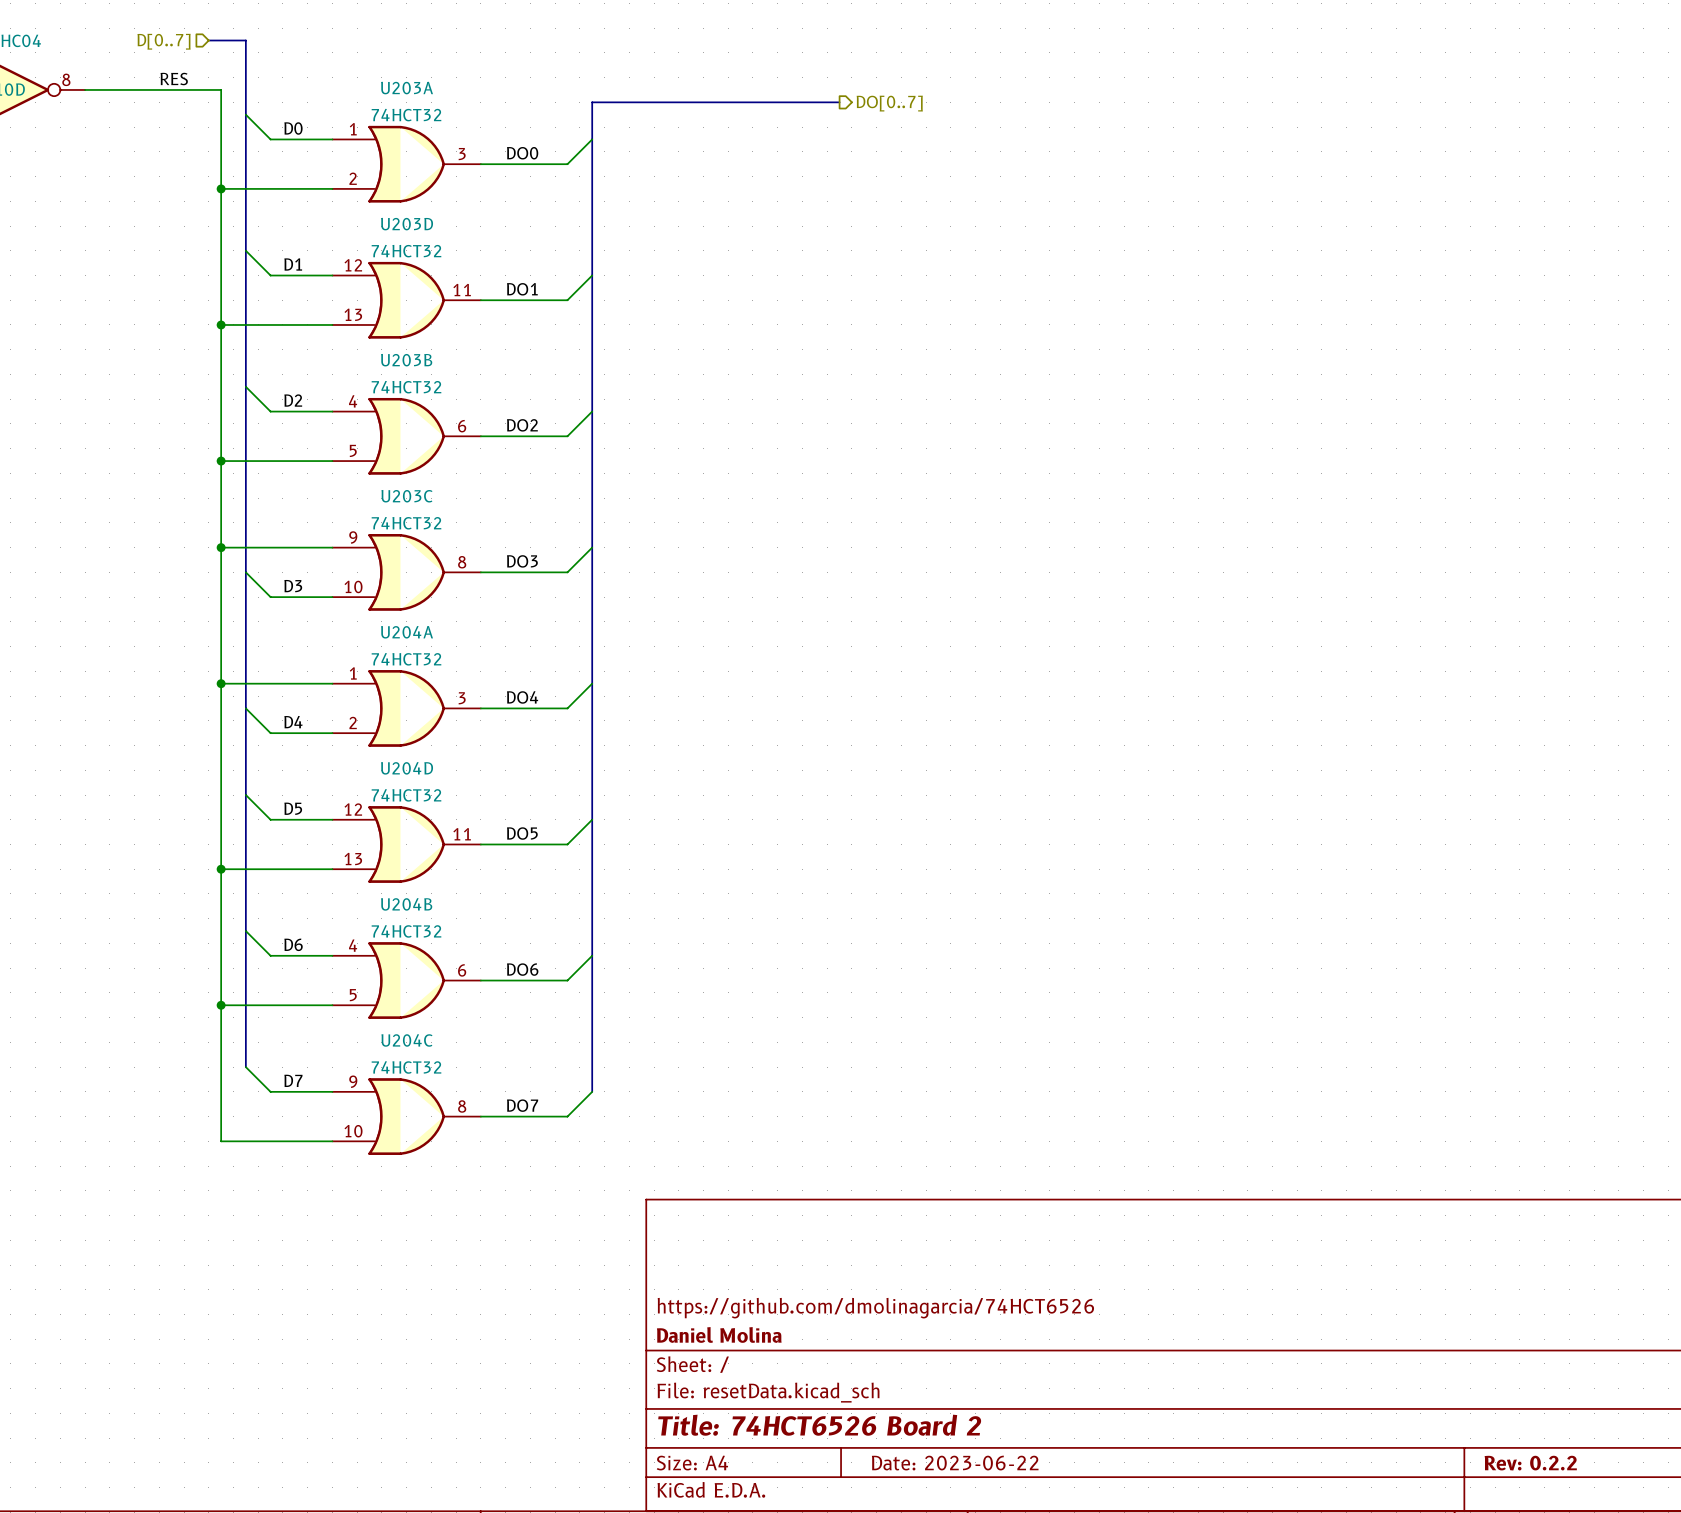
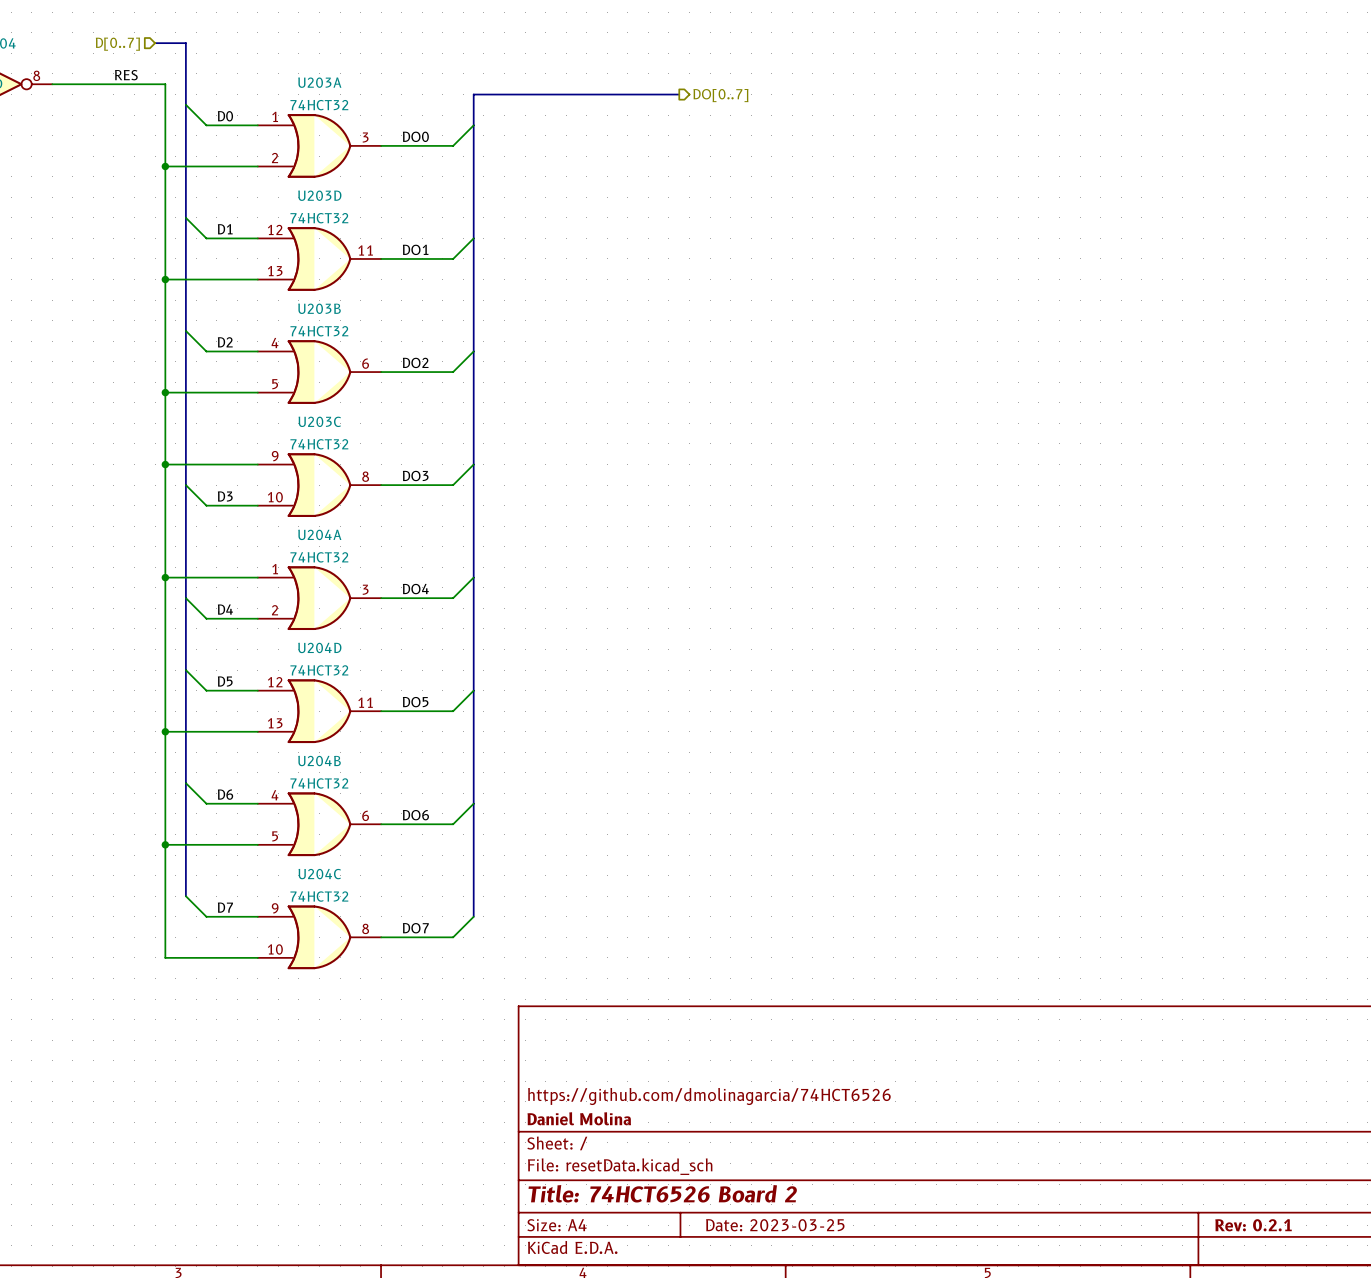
title block: Date: 2023-06-22 (955, 1463) -> Date: 2023-03-25 (775, 1225)
title block: Rev: 0.2.2 (1530, 1463) -> Rev: 0.2.1 (1253, 1225)

